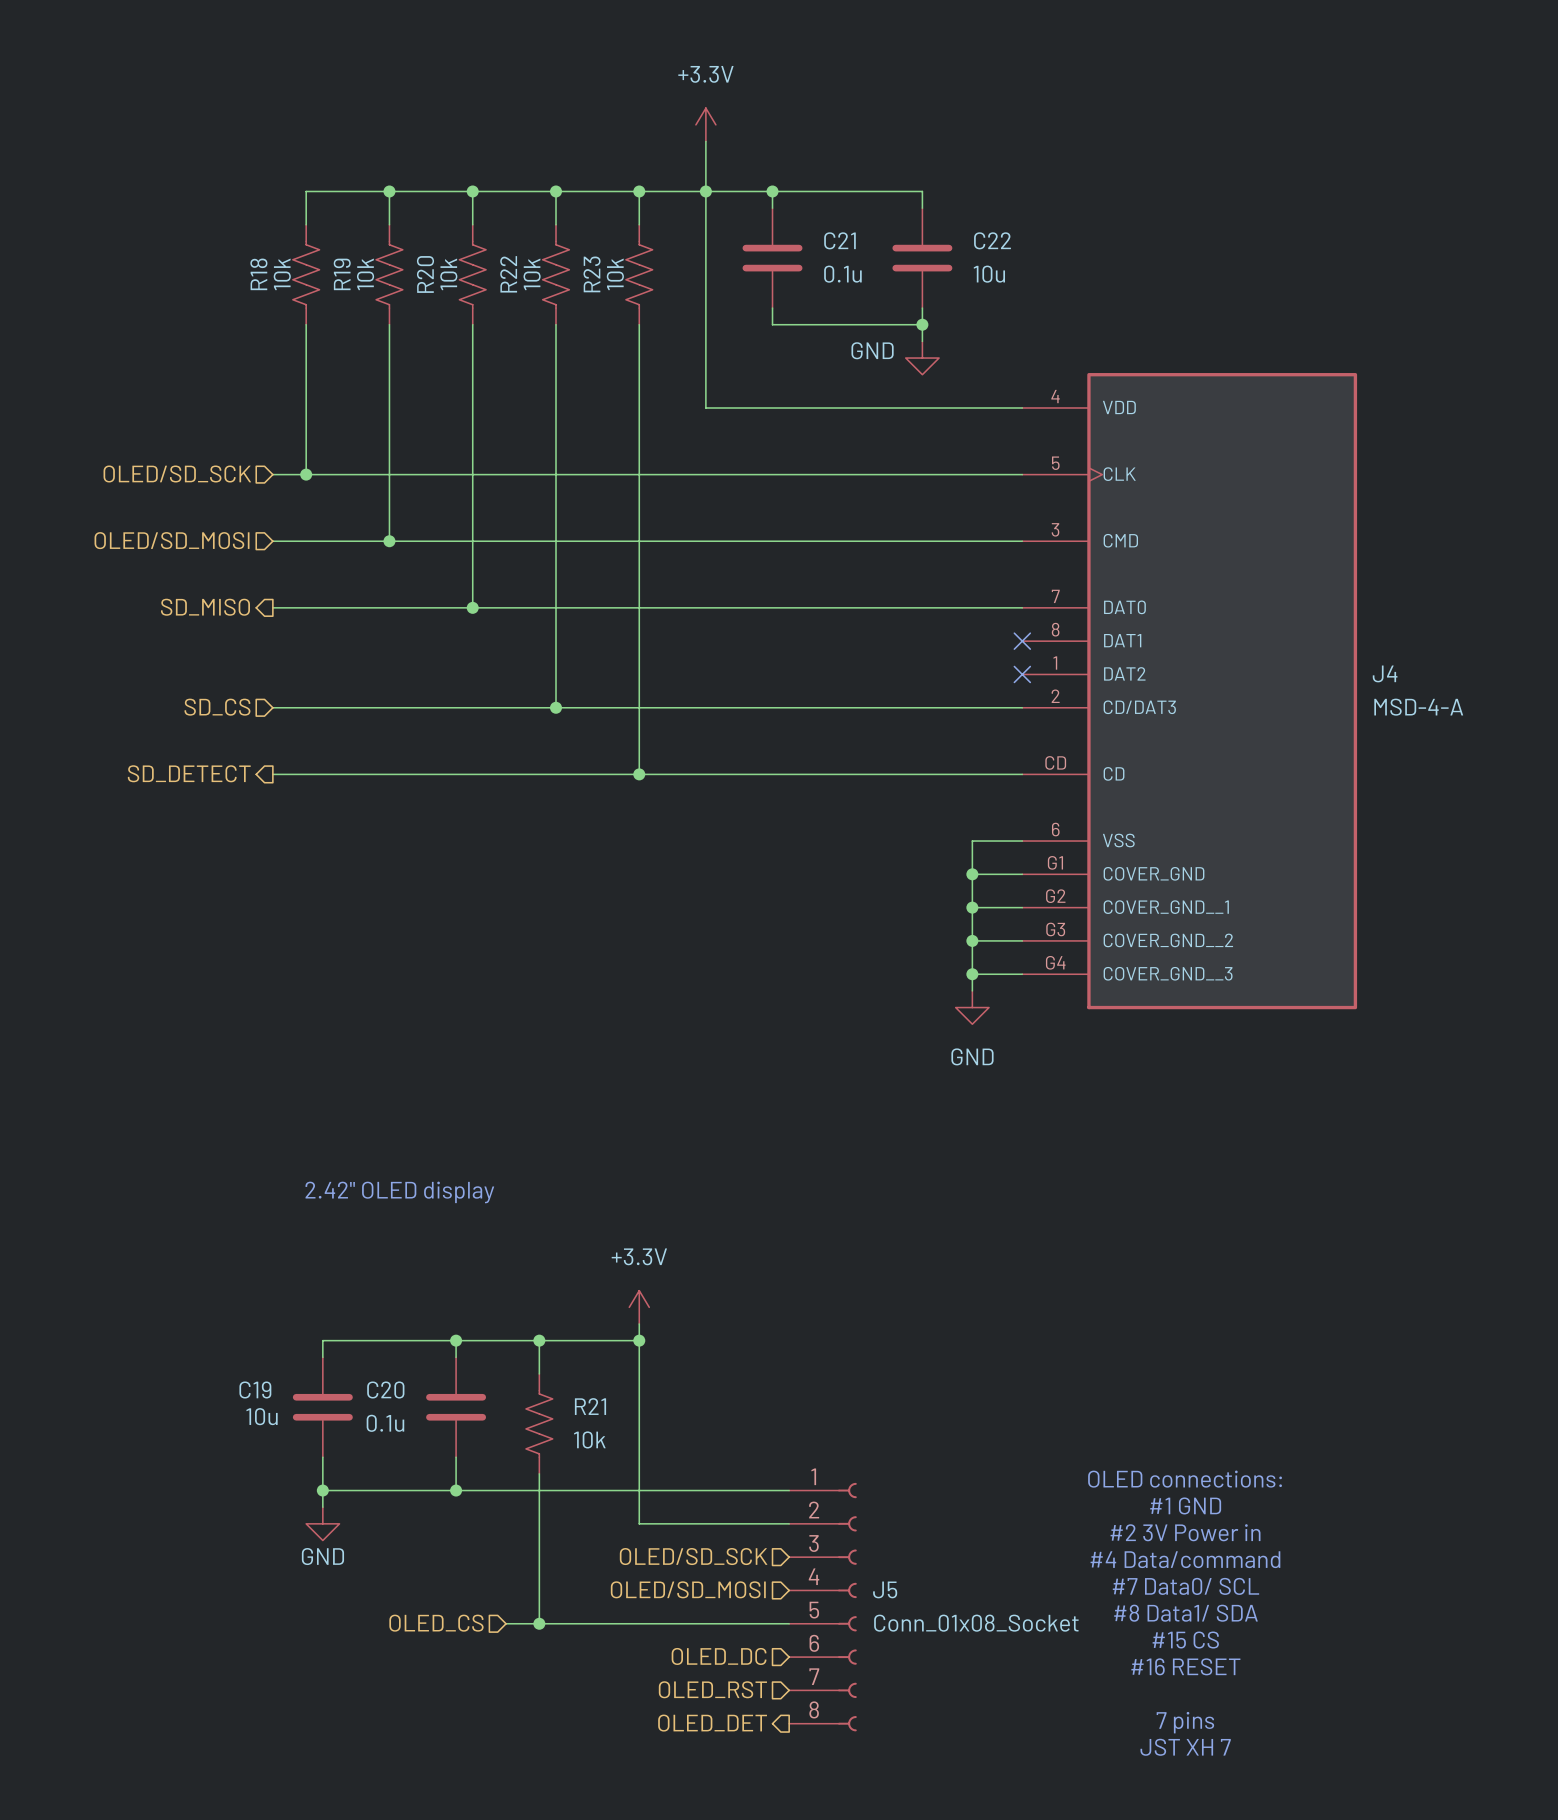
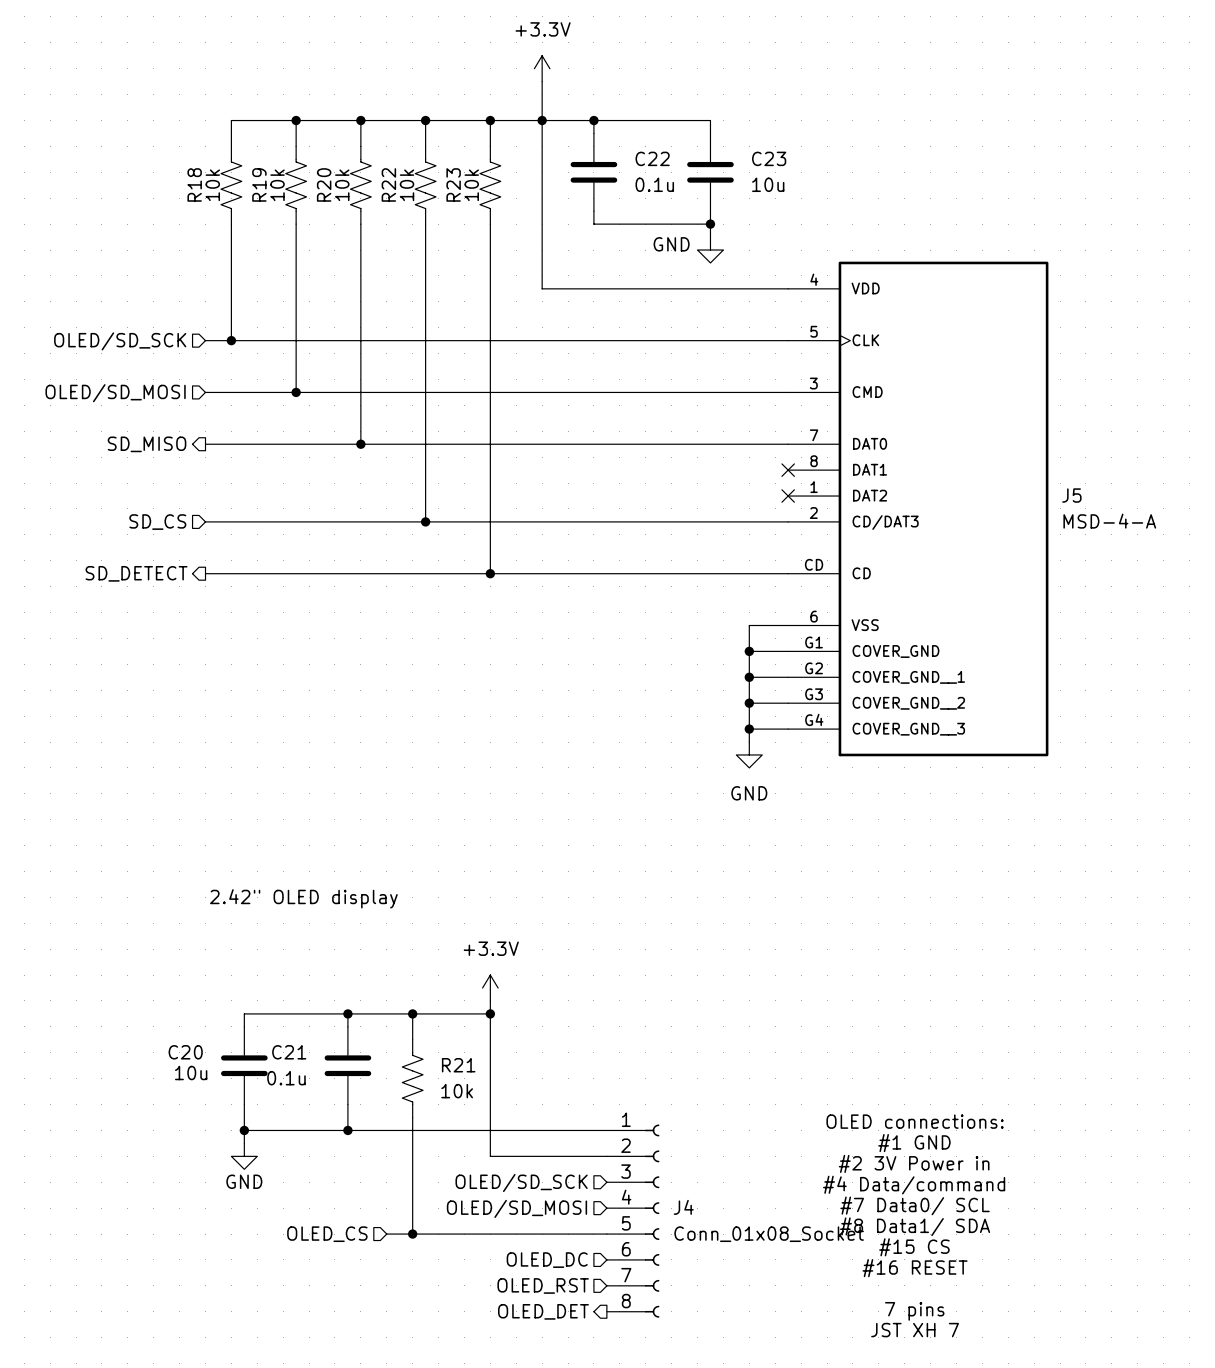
C21 name: C21 (839, 240) -> C22 (652, 158)
C22 name: C22 (992, 240) -> C23 (769, 158)
J4 name: J4 (1385, 673) -> J5 (1071, 495)
C19 name: C19 (255, 1390) -> C20 (185, 1052)
C20 name: C20 (385, 1390) -> C21 (289, 1052)
J5 name: J5 (885, 1589) -> J4 (683, 1207)

